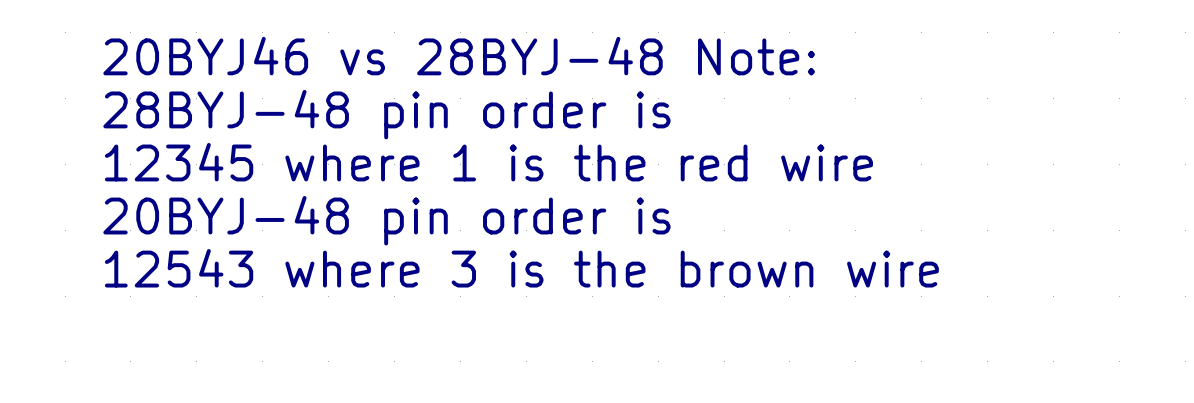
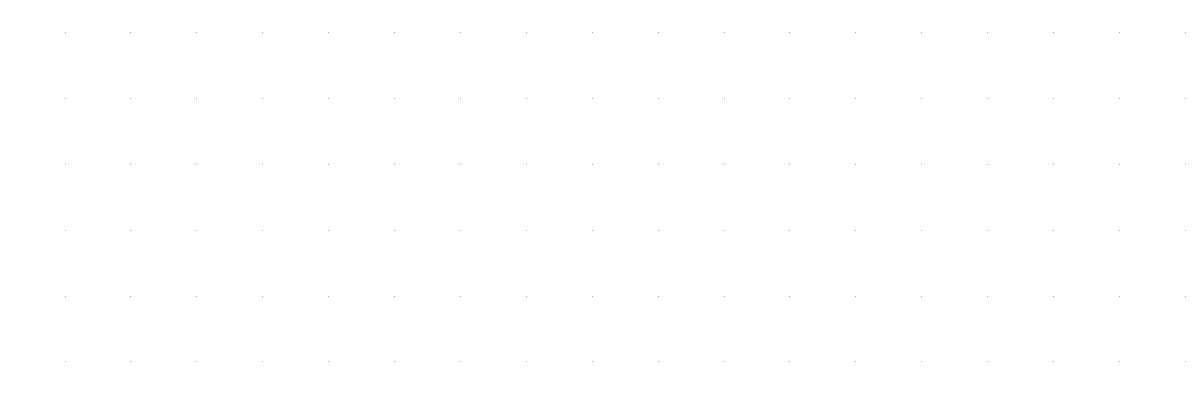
text: 20BYJ46 vs 28BYJ-48 Note: (459, 56) -> none
text: 28BYJ-48 pin order is (386, 114) -> none
text: 12345 where 1 is the red wire (488, 162) -> none
text: 20BYJ-48 pin order is (386, 220) -> none
text: 12543 where 3 is the brown wire (521, 268) -> none

